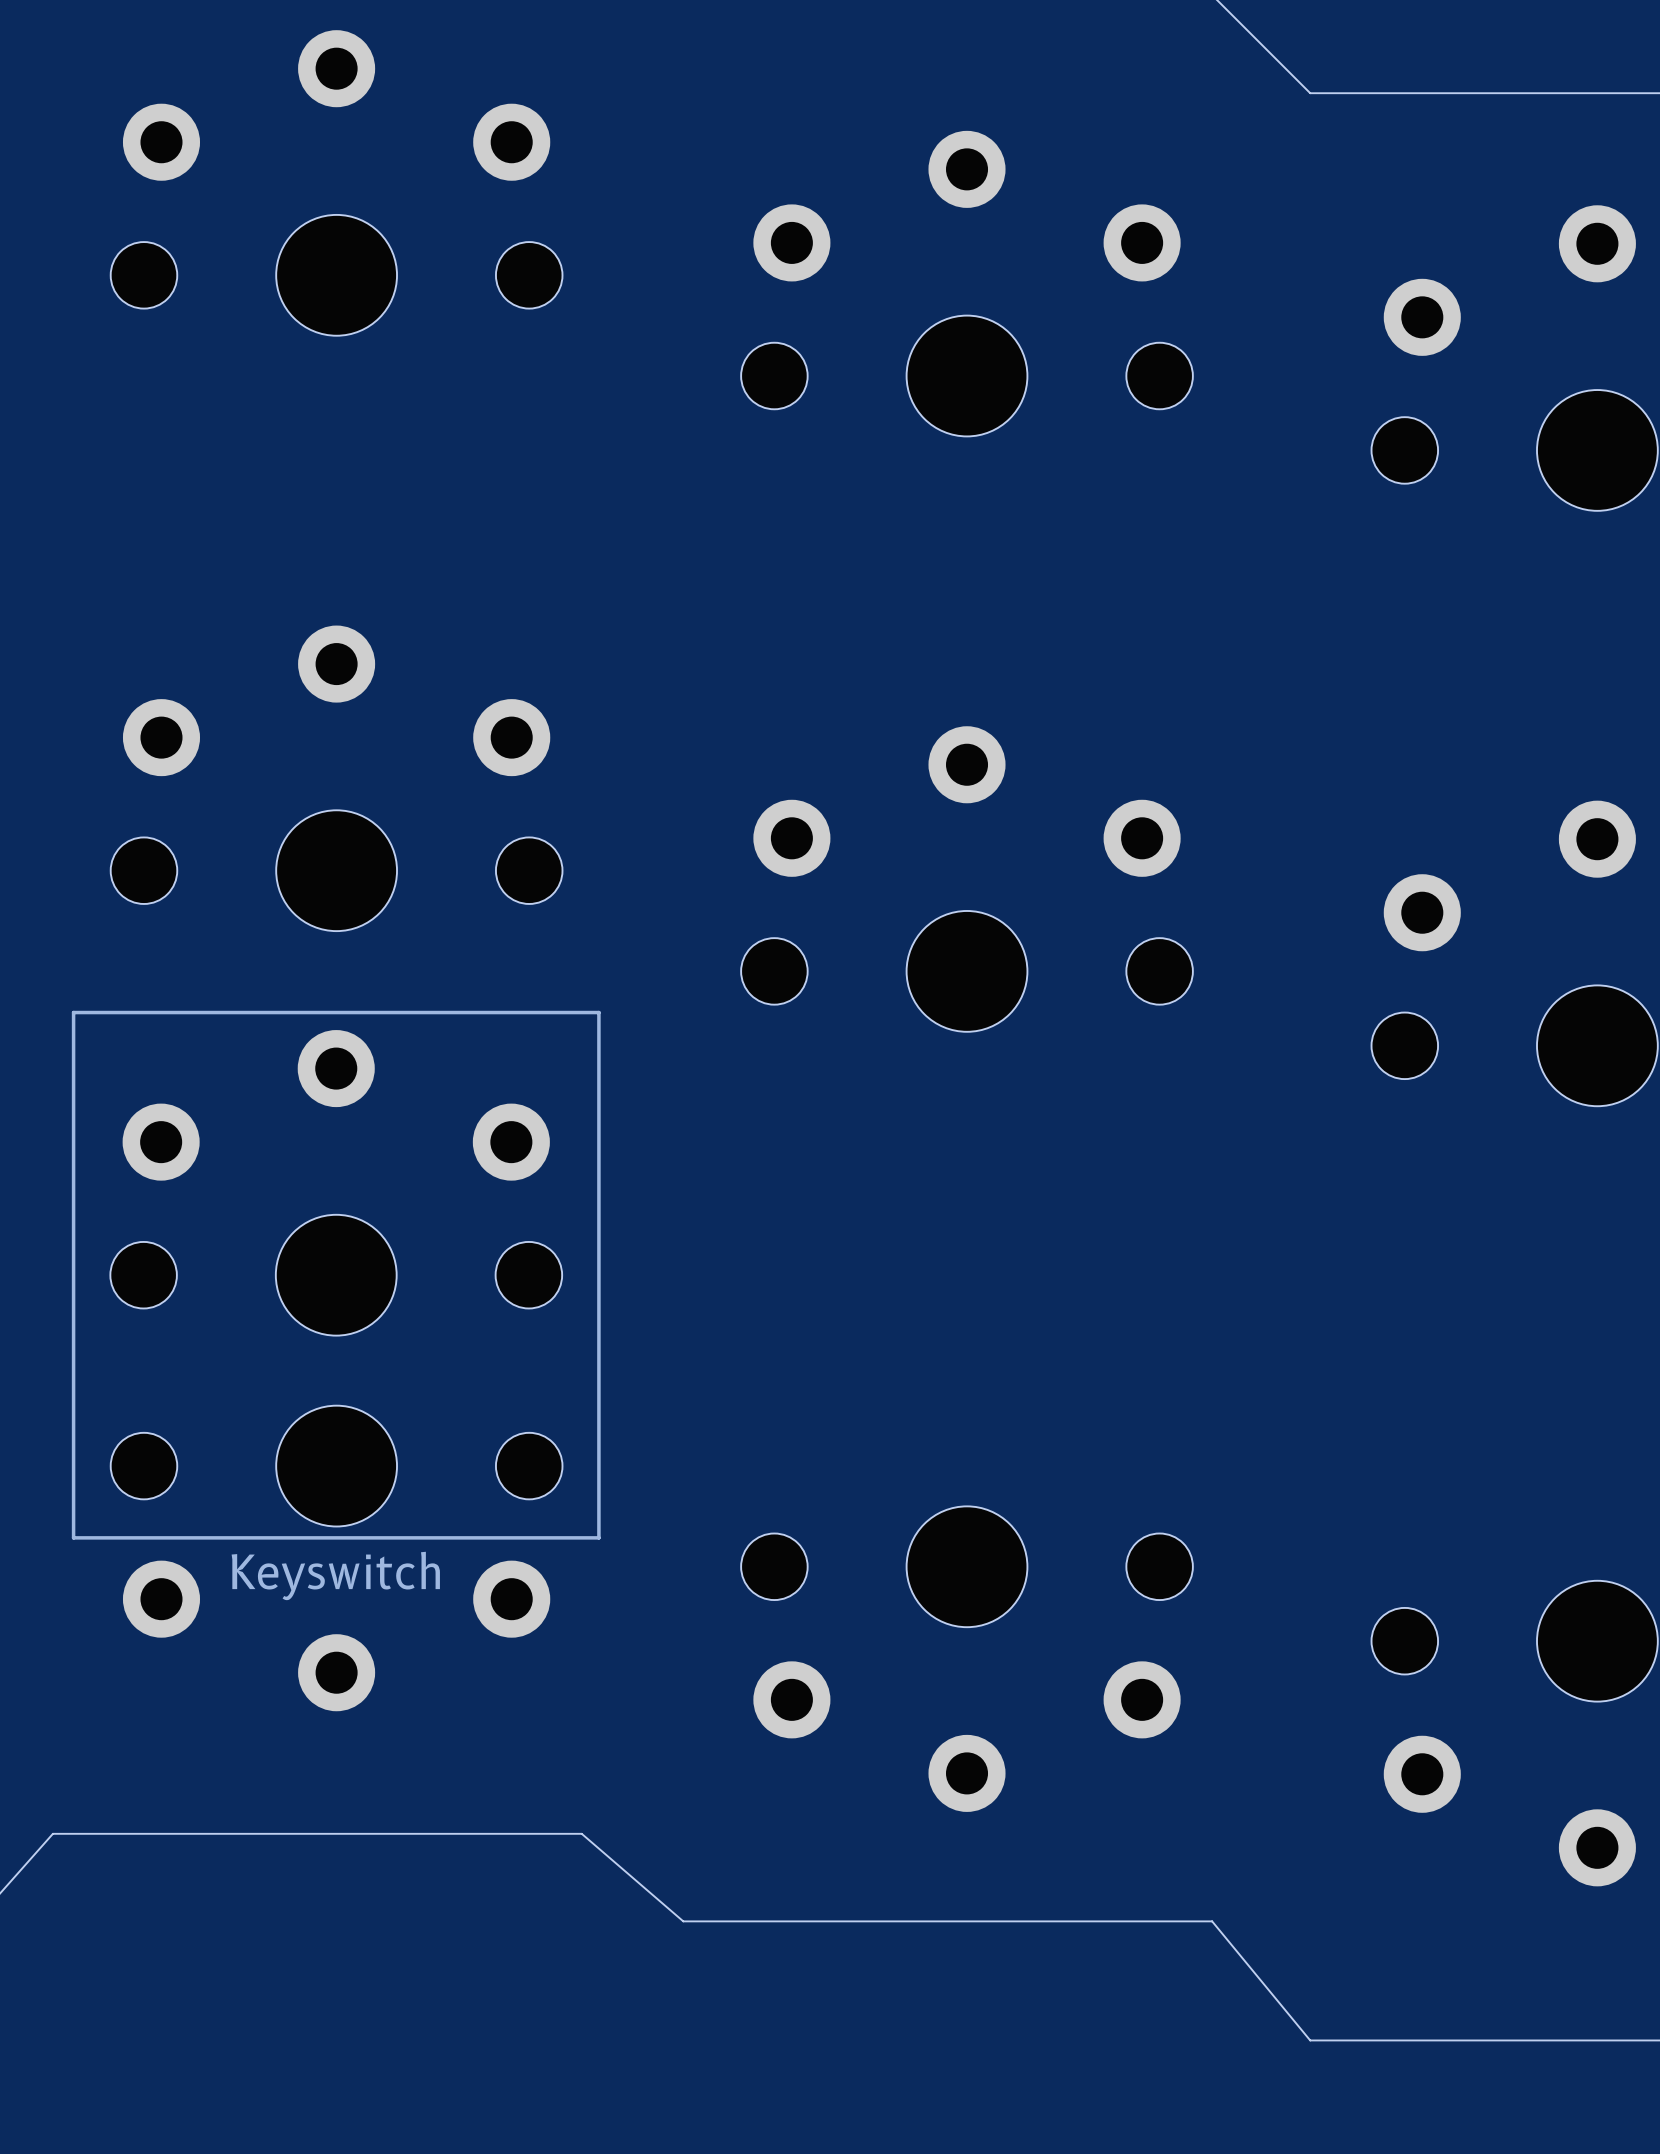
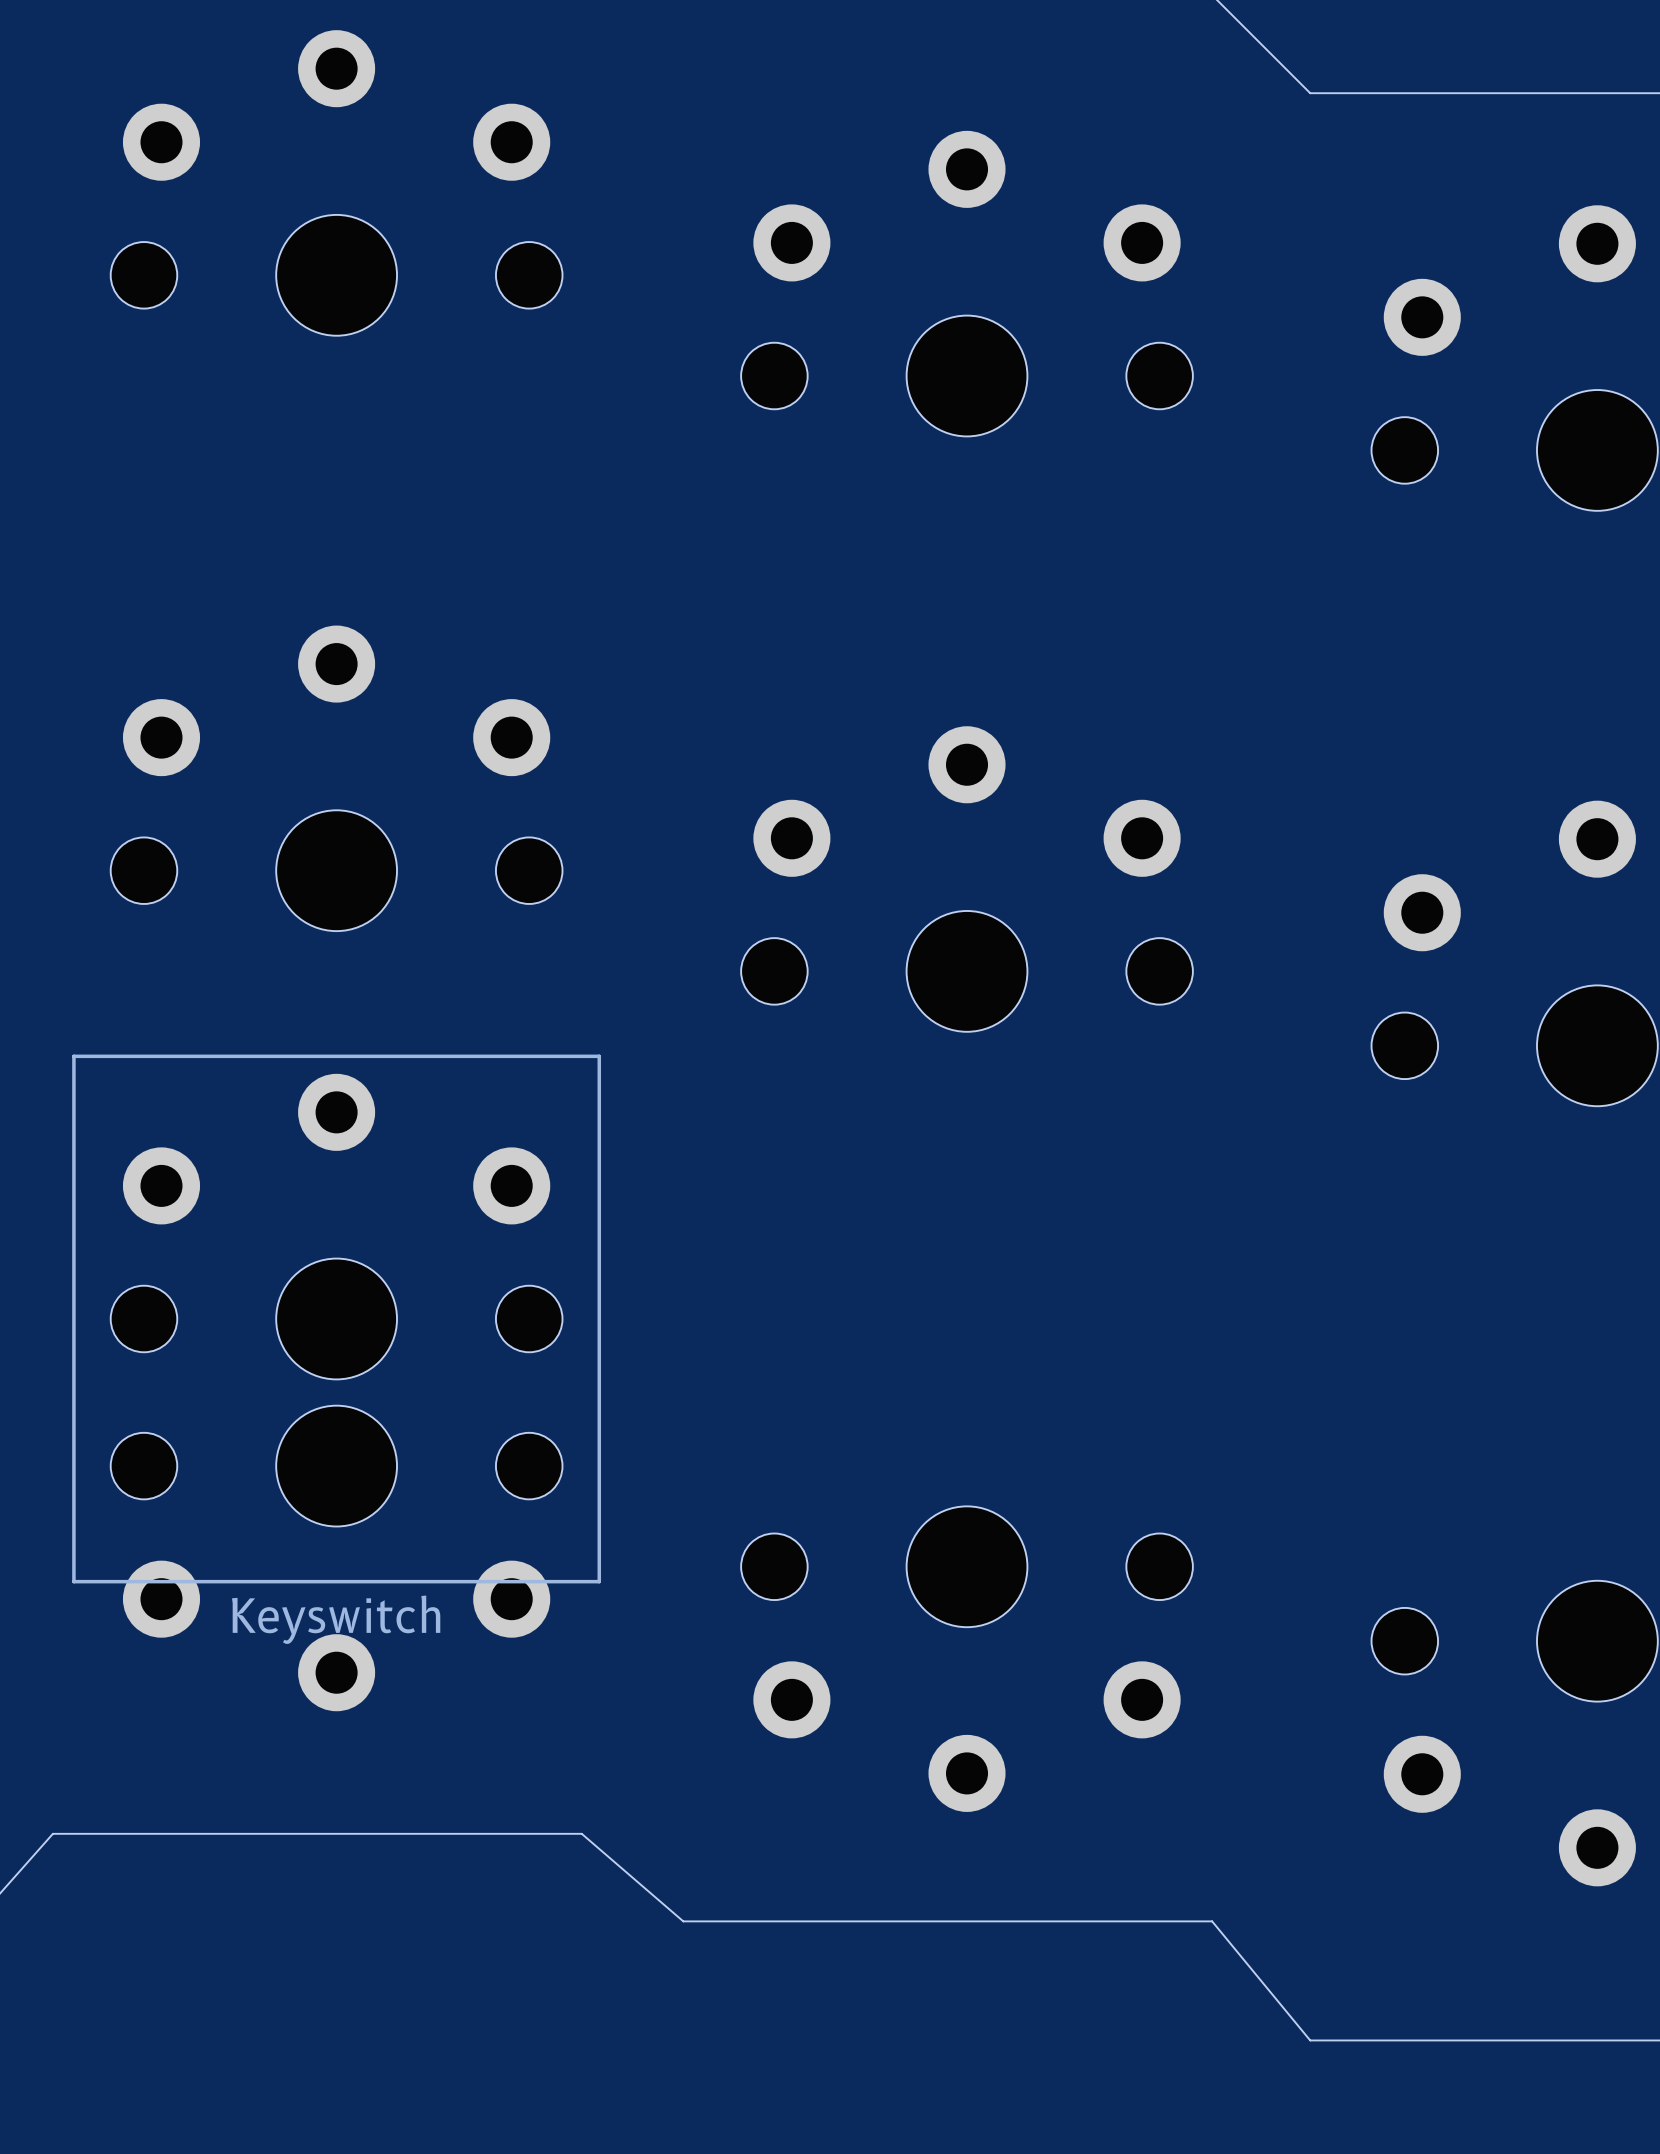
part position: (336, 1275) -> (336, 1318)

